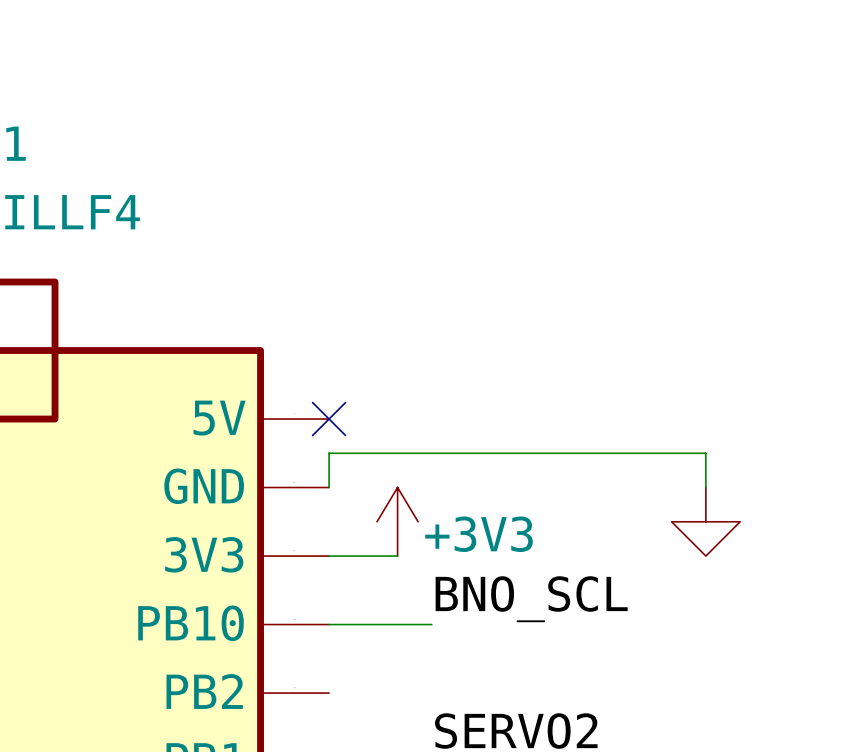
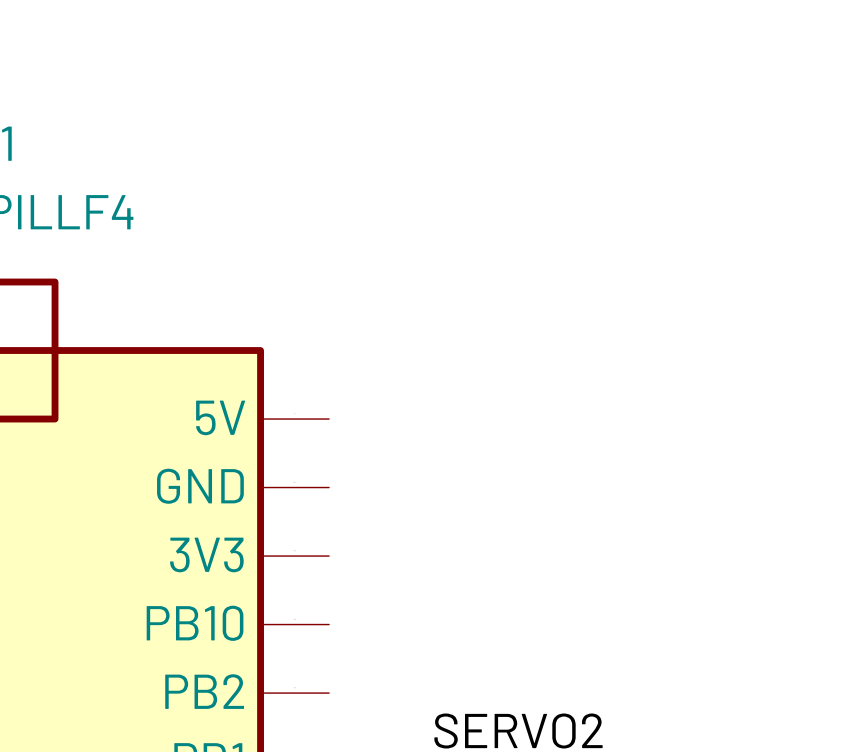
no-connect mark: (329, 419) -> none
wire: (329, 487) (329, 453) (705, 453) (705, 487) -> none
power symbol: +3V3 (397, 521) -> none
power symbol: (705, 521) -> none
wire: (329, 556) (397, 556) -> none
label: BNO_SCL (531, 599) -> none
wire: (329, 624) (431, 624) -> none

